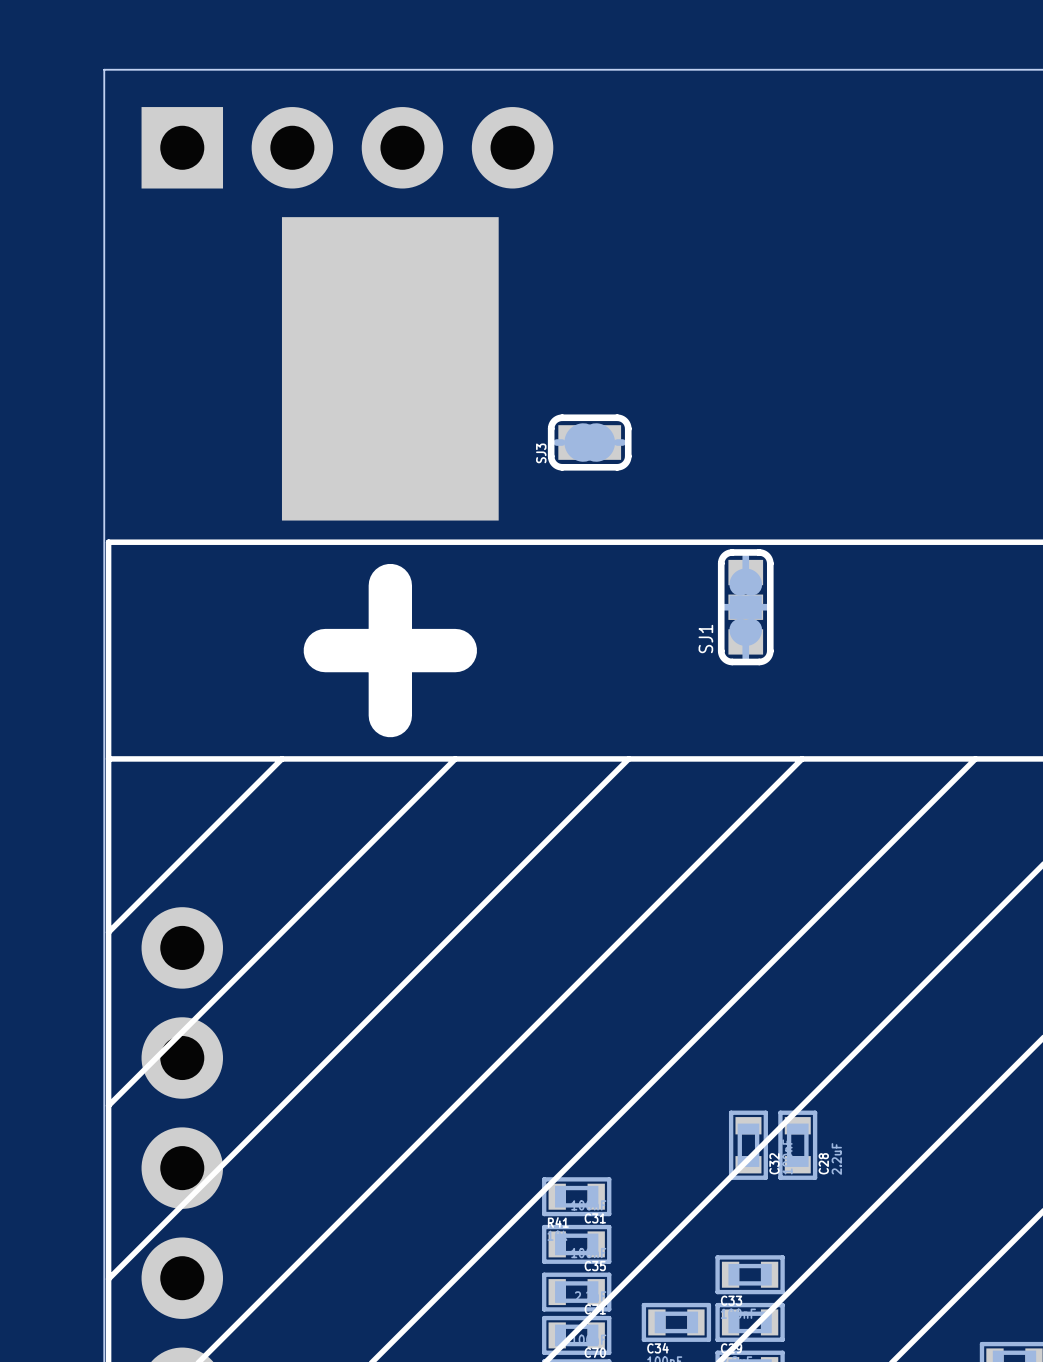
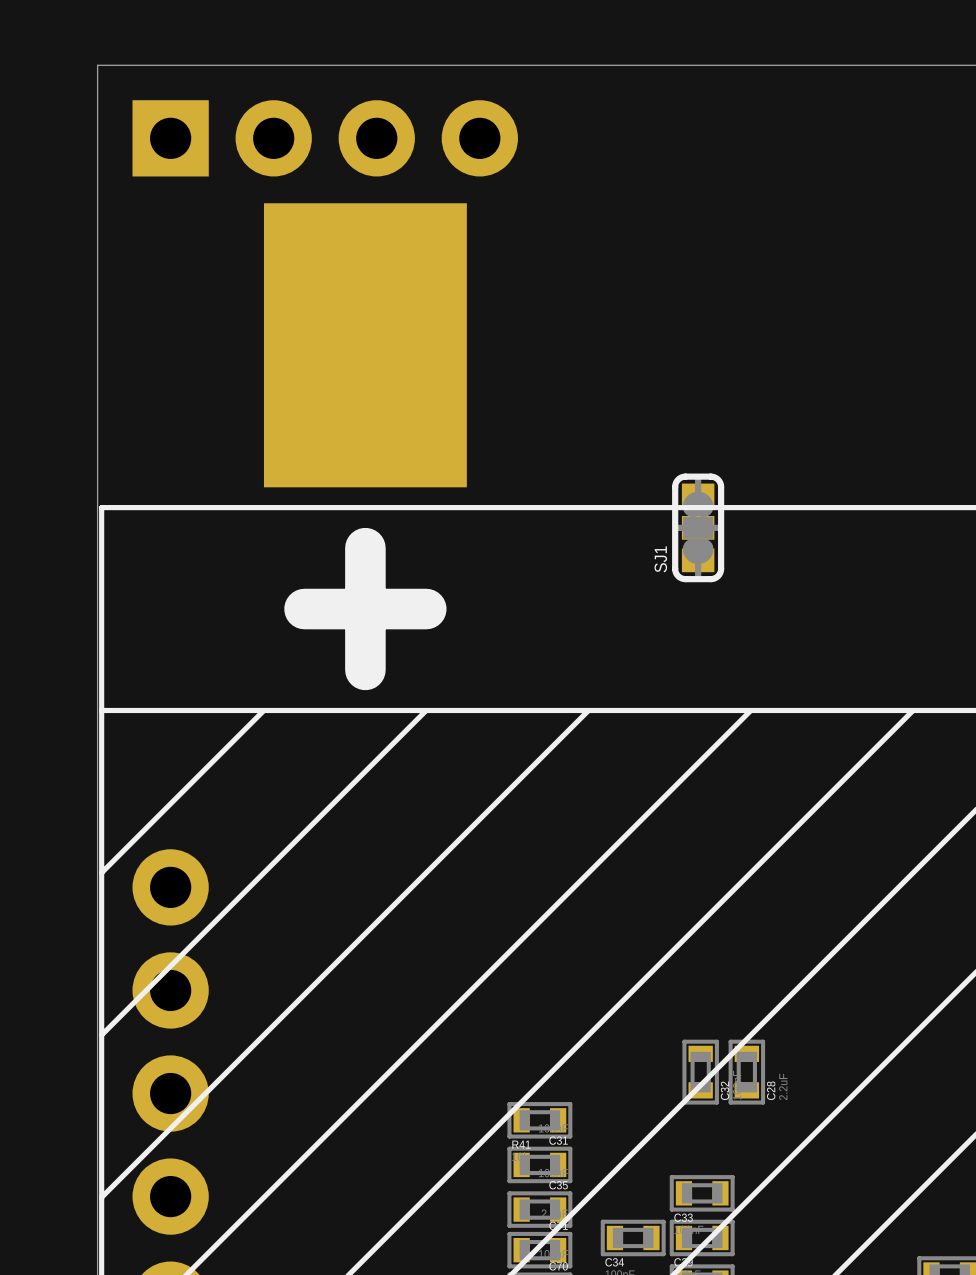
SJ3: (589, 442) -> none
SJ1 position: (745, 607) -> (698, 527)

